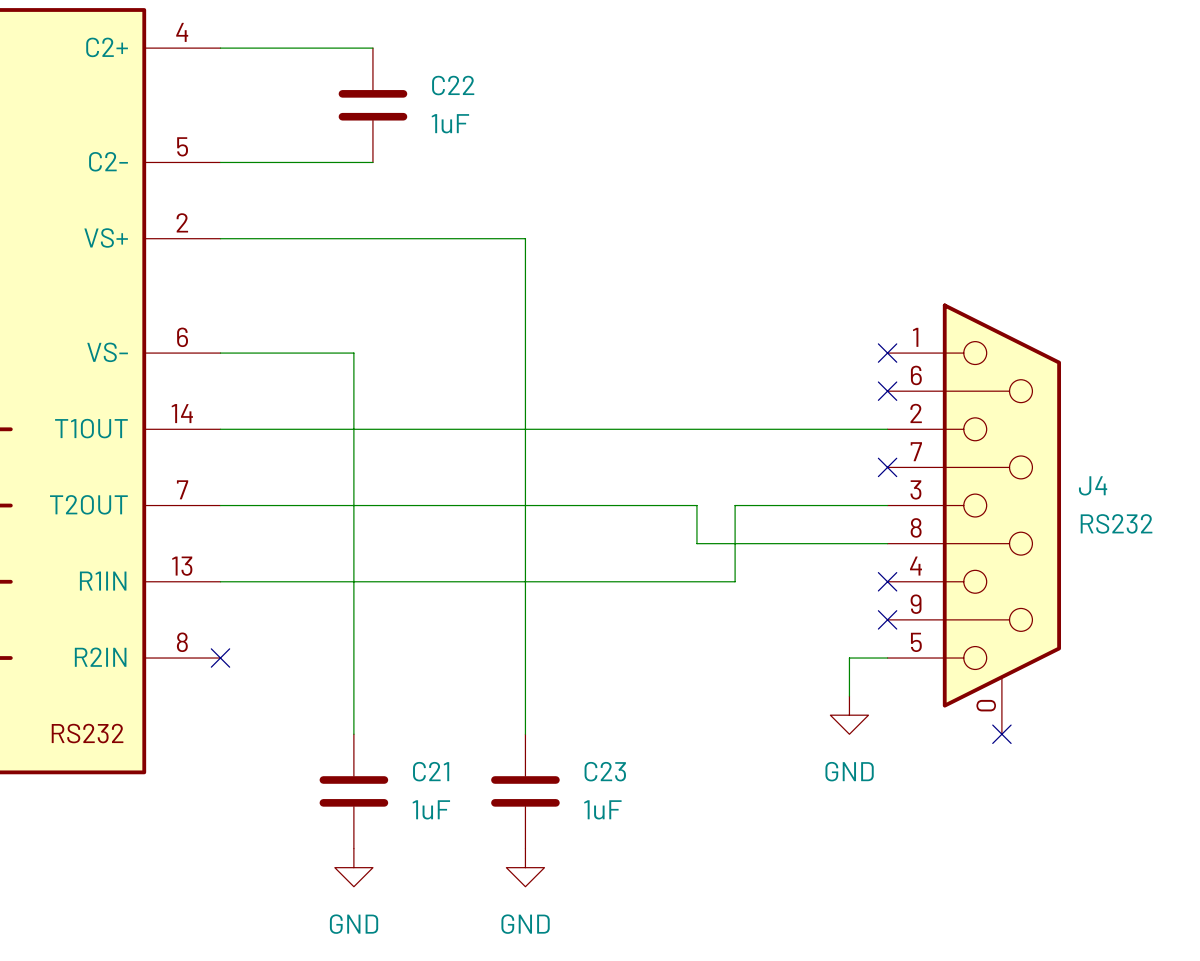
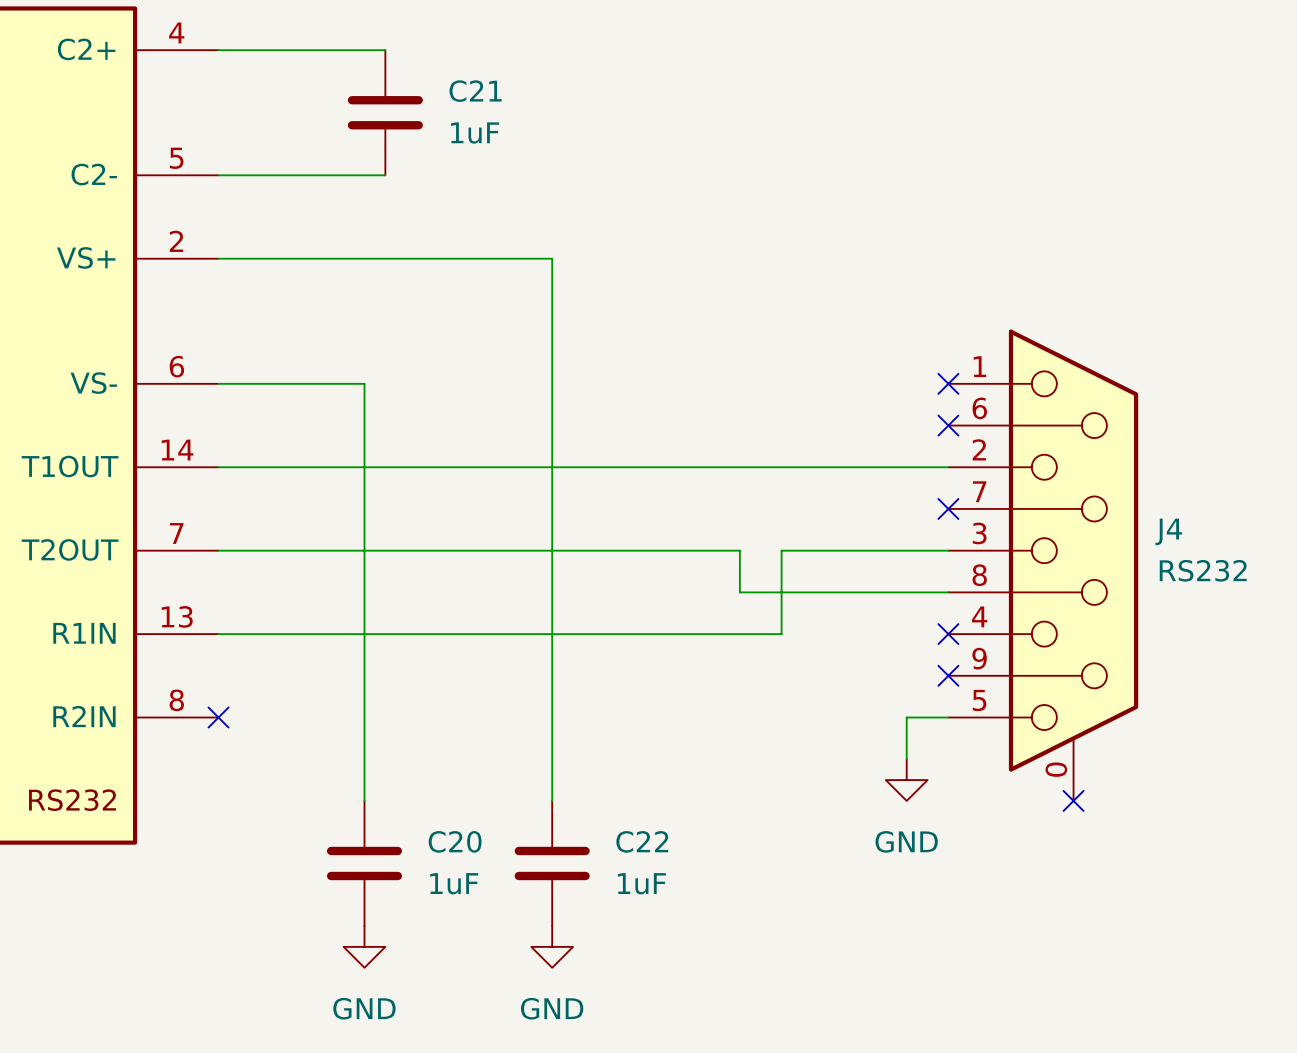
C22 name: C22 (453, 85) -> C21 (475, 91)
C21 name: C21 (431, 771) -> C20 (455, 841)
C23 name: C23 (605, 771) -> C22 (642, 841)

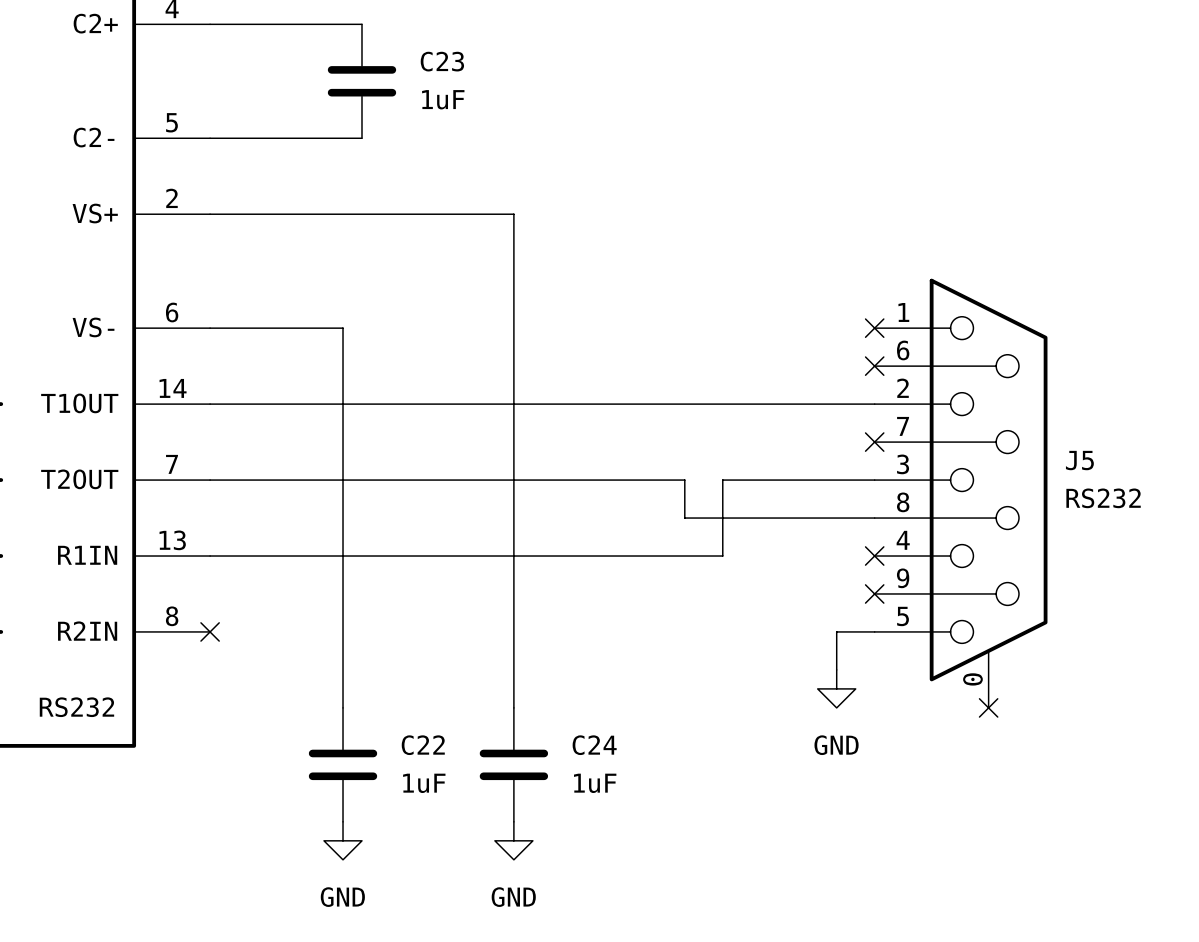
C21 name: C21 (475, 91) -> C23 (442, 61)
J4 name: J4 (1168, 531) -> J5 (1079, 460)
C20 name: C20 (455, 841) -> C22 (423, 745)
C22 name: C22 (642, 841) -> C24 (594, 745)

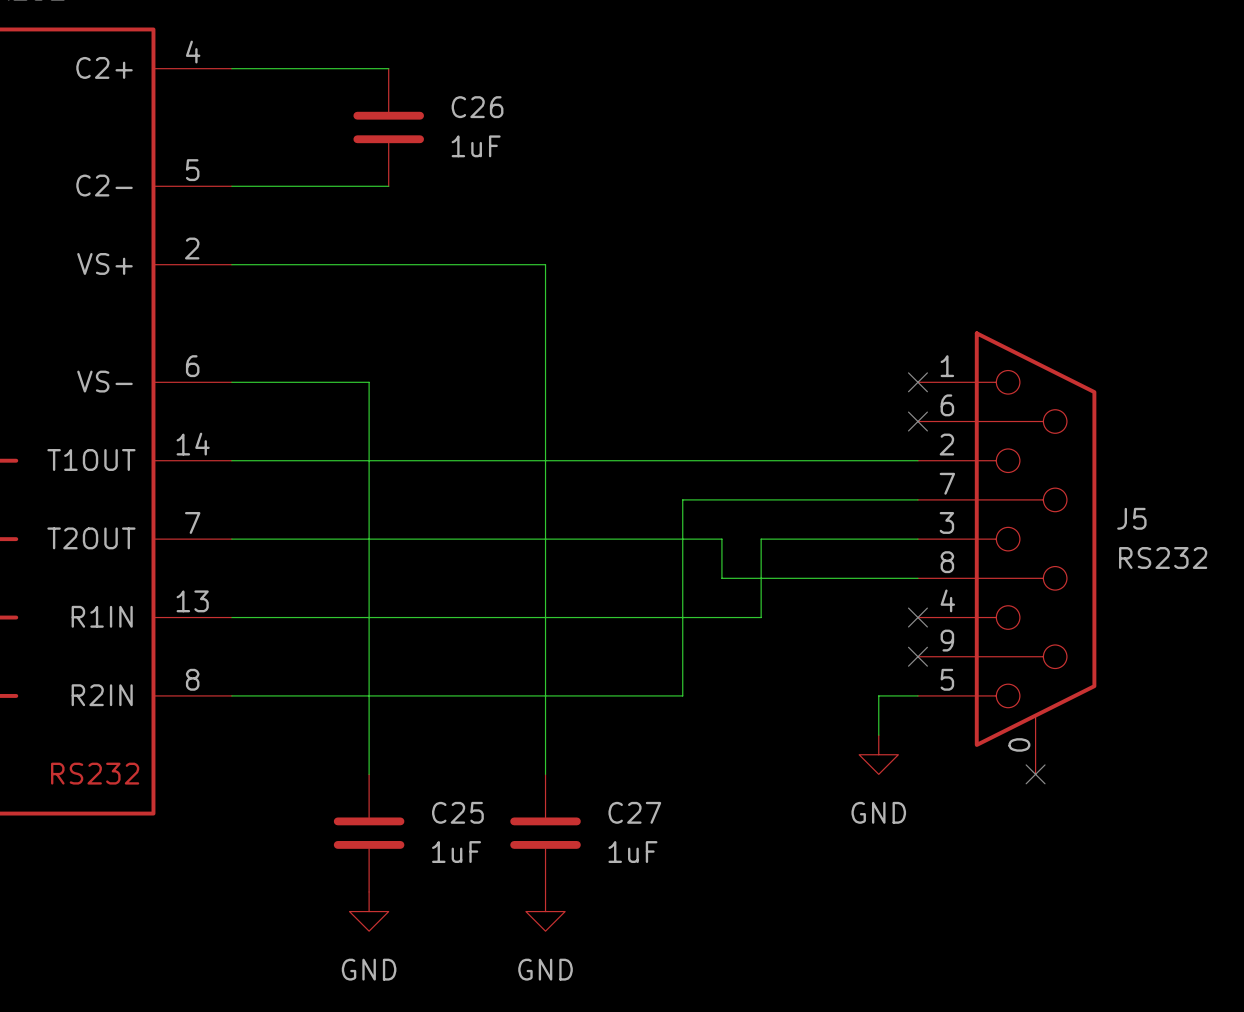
C23 name: C23 (442, 61) -> C26 (477, 107)
wire: none -> (917, 499) (682, 499) (682, 695) (231, 695)
no-connect mark: (874, 442) -> none
no-connect mark: (210, 631) -> none
C22 name: C22 (423, 745) -> C25 (457, 812)
C24 name: C24 (594, 745) -> C27 (634, 812)

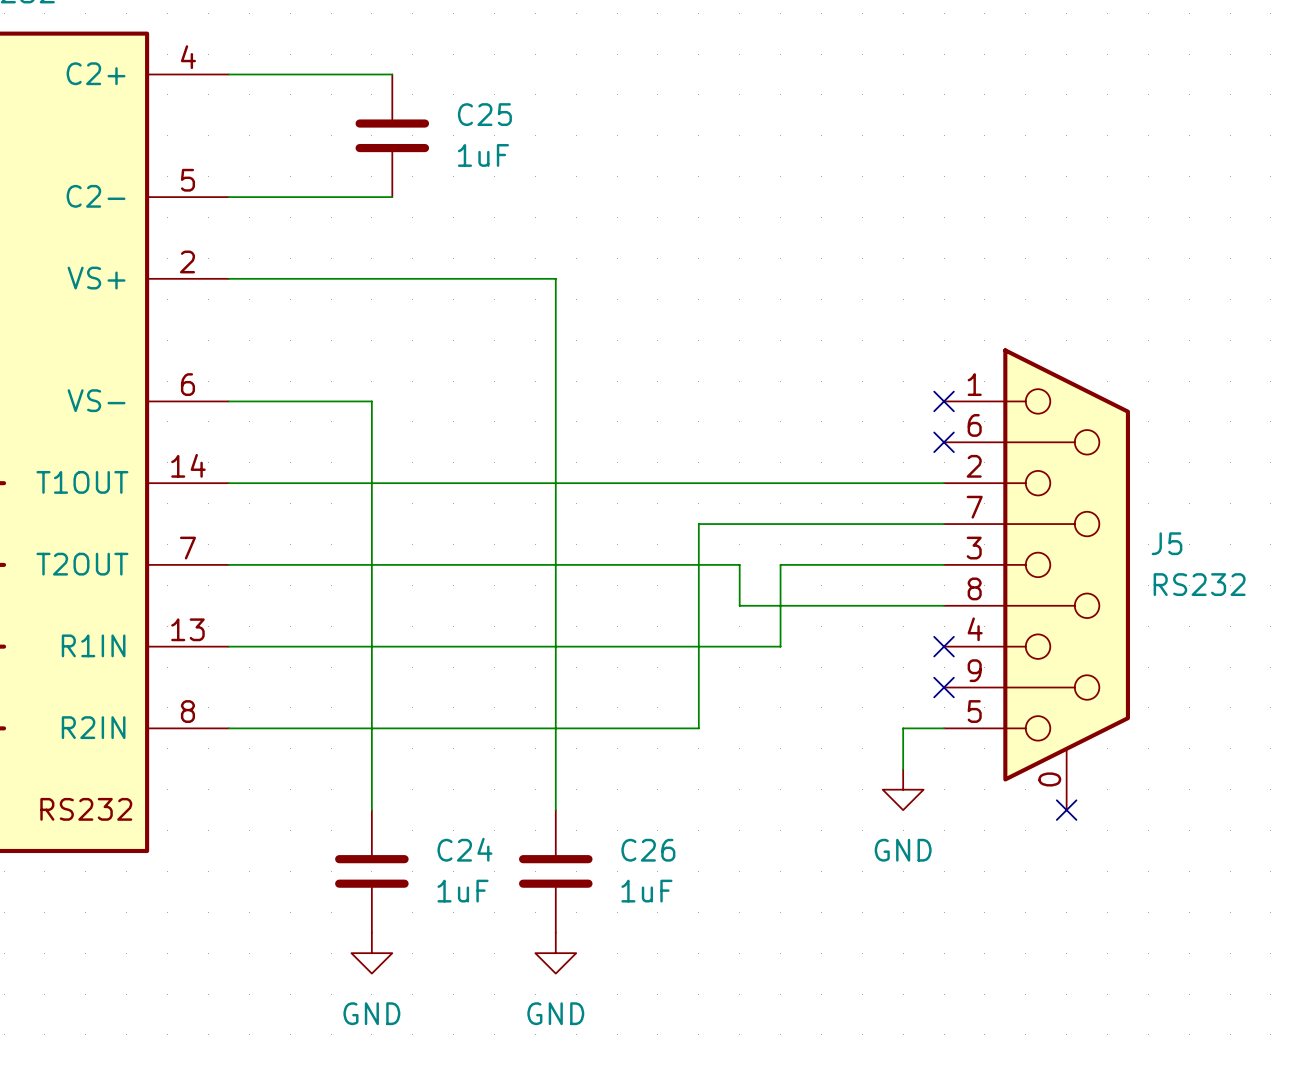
C26 name: C26 (477, 107) -> C25 (484, 114)
C25 name: C25 (457, 812) -> C24 (464, 849)
C27 name: C27 (634, 812) -> C26 (648, 850)

